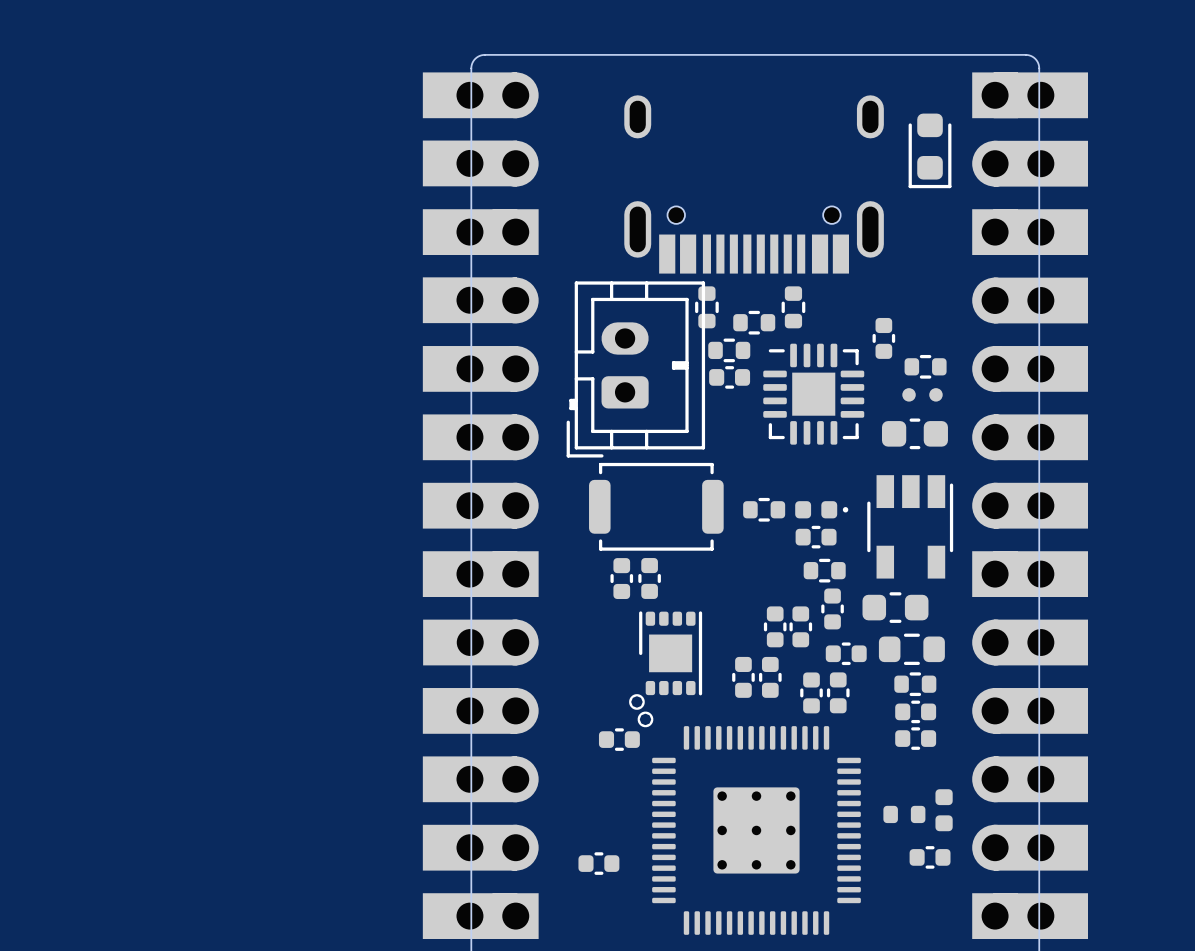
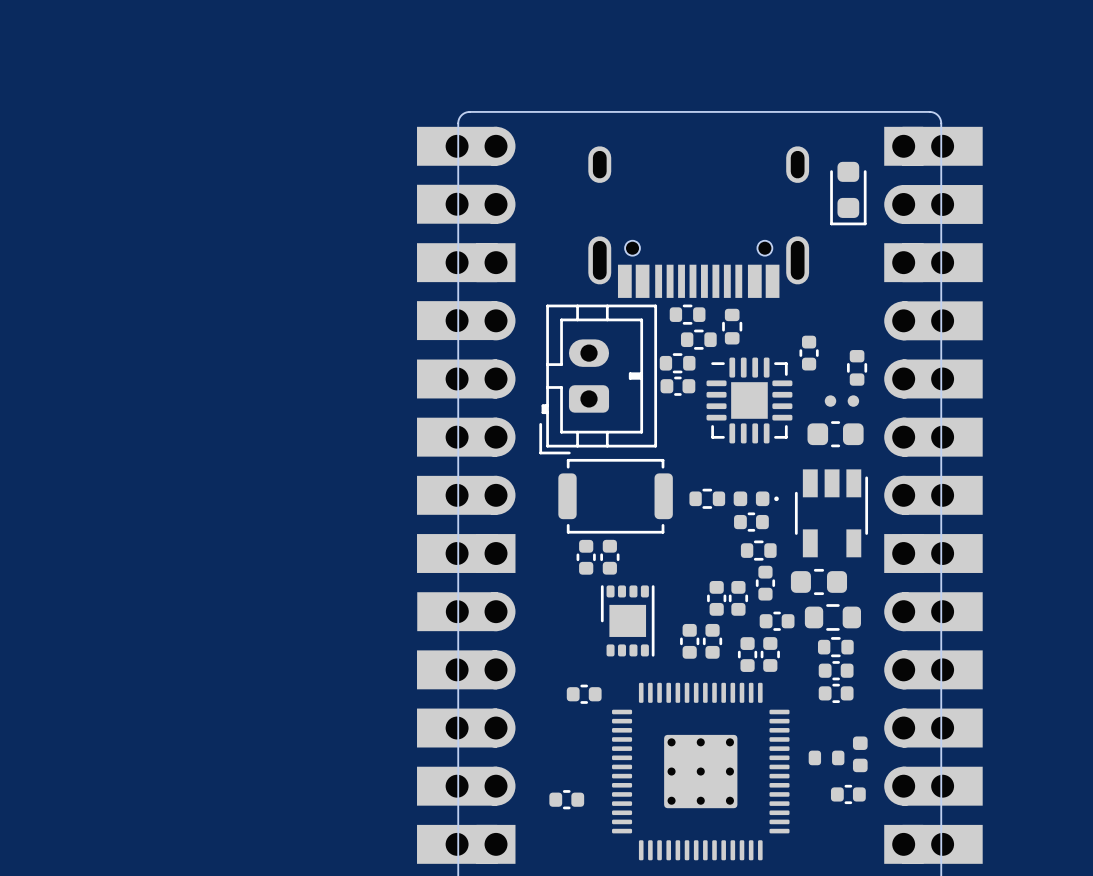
part rotation: 0° (706, 307) -> 90° clockwise (687, 314)
part position: (706, 307) -> (687, 314)
part rotation: 0° (925, 366) -> 90° clockwise (857, 367)
drawing: [629, 694, 654, 728] -> none

